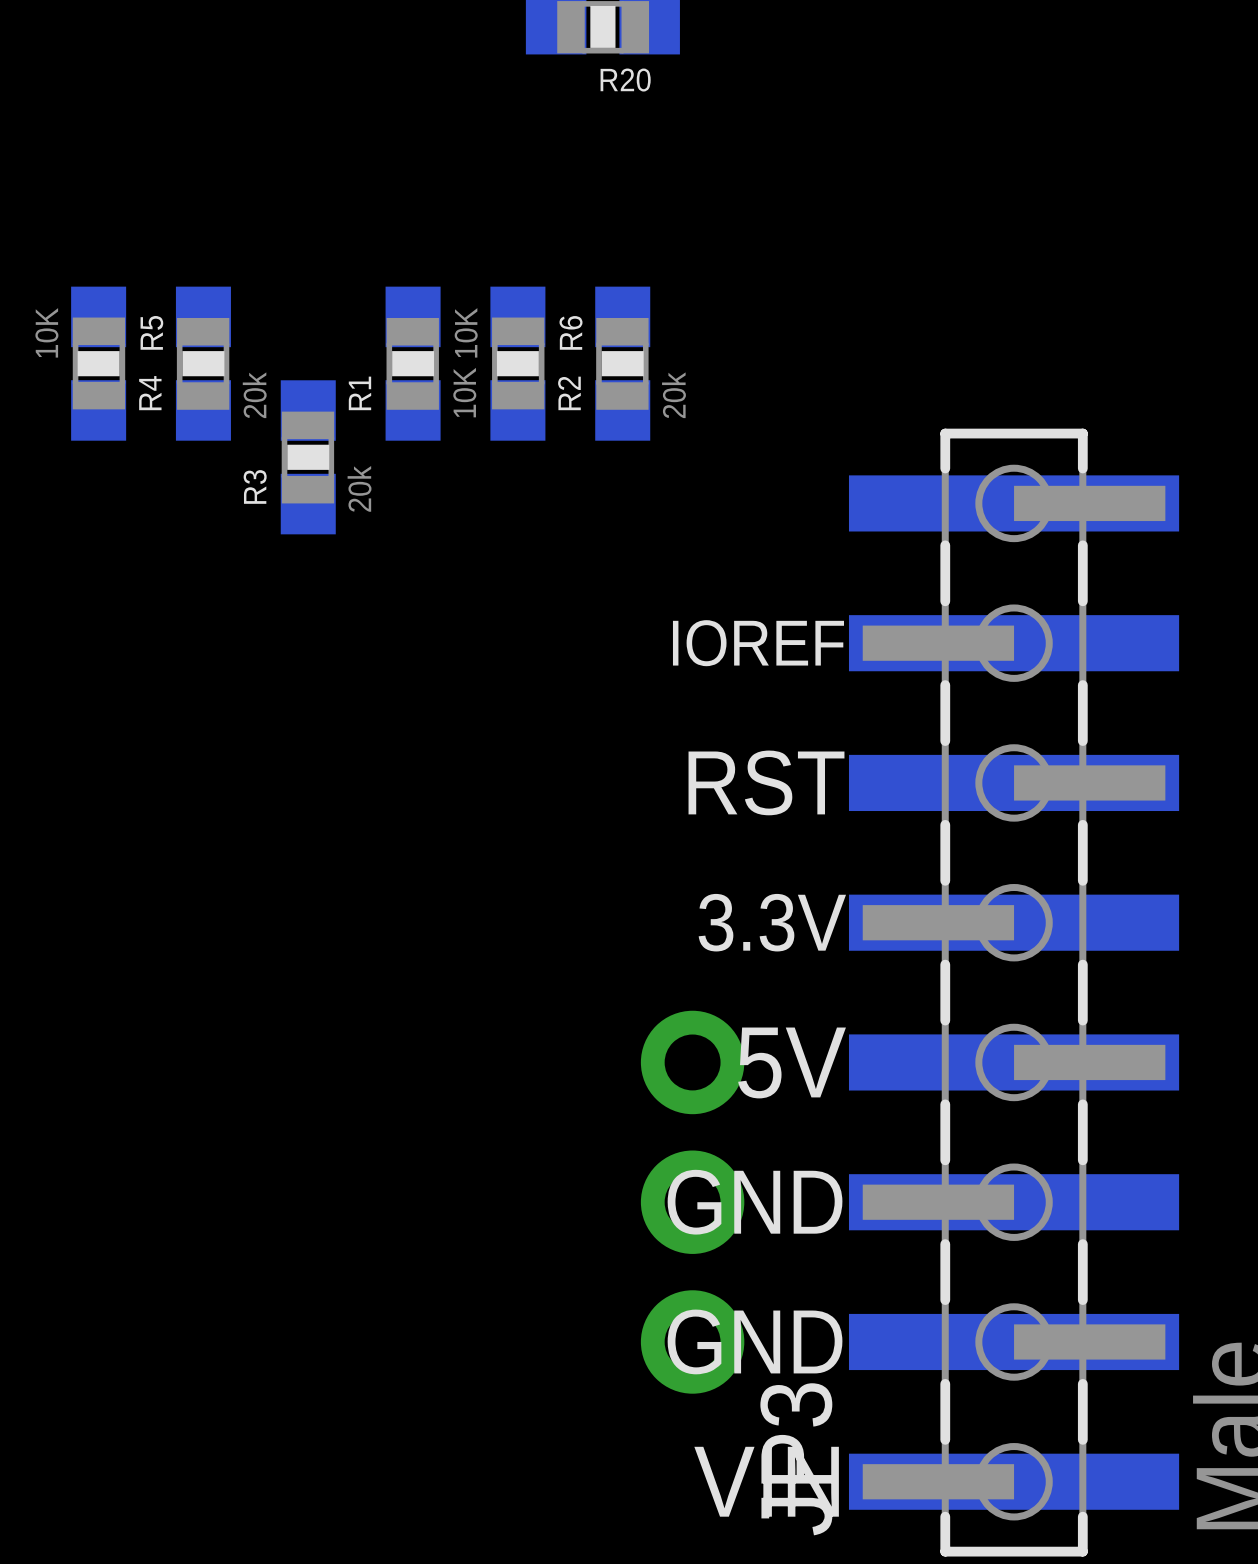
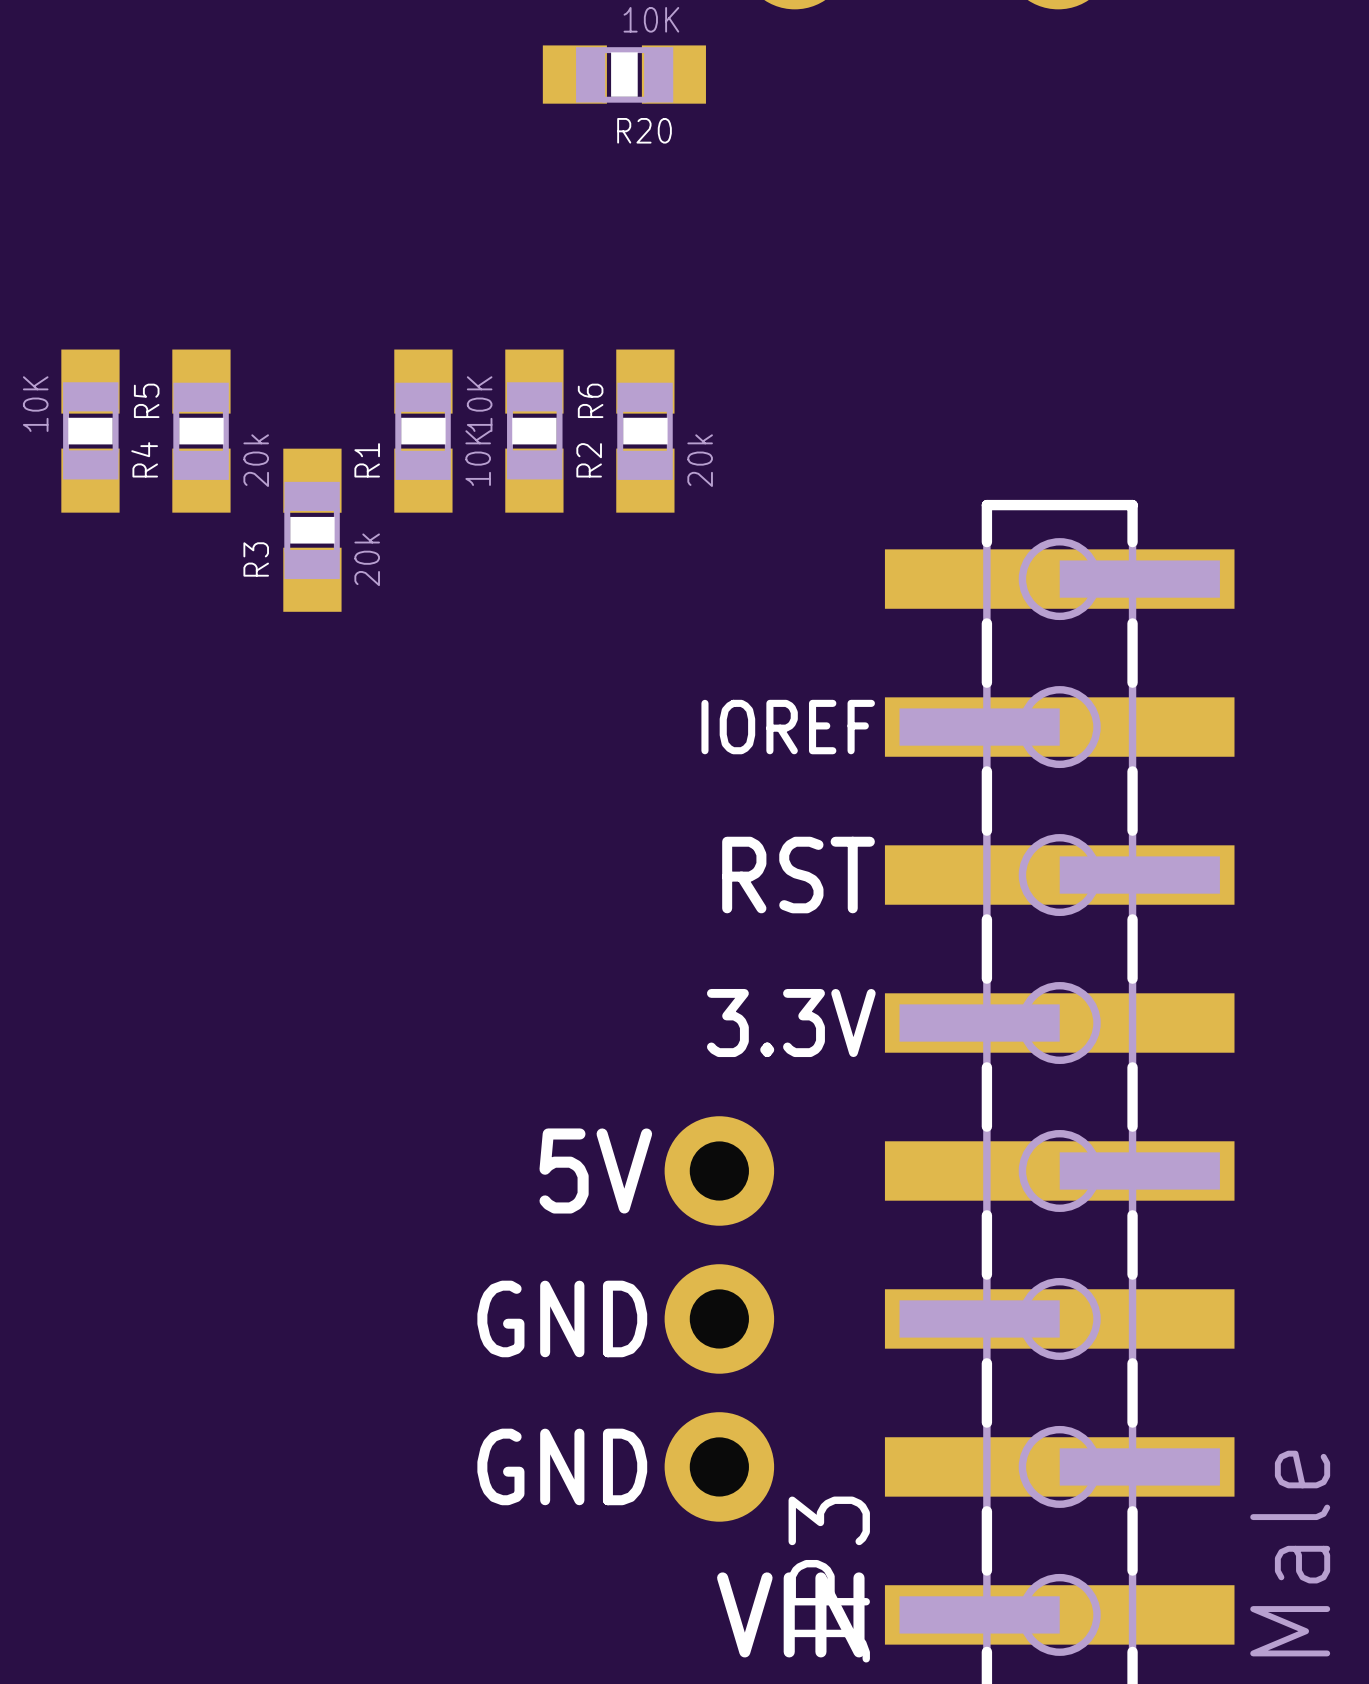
text position: 5V (792, 1062) -> 5V (595, 1170)
text position: GND (755, 1202) -> GND (562, 1318)
text position: GND (755, 1341) -> GND (562, 1466)

